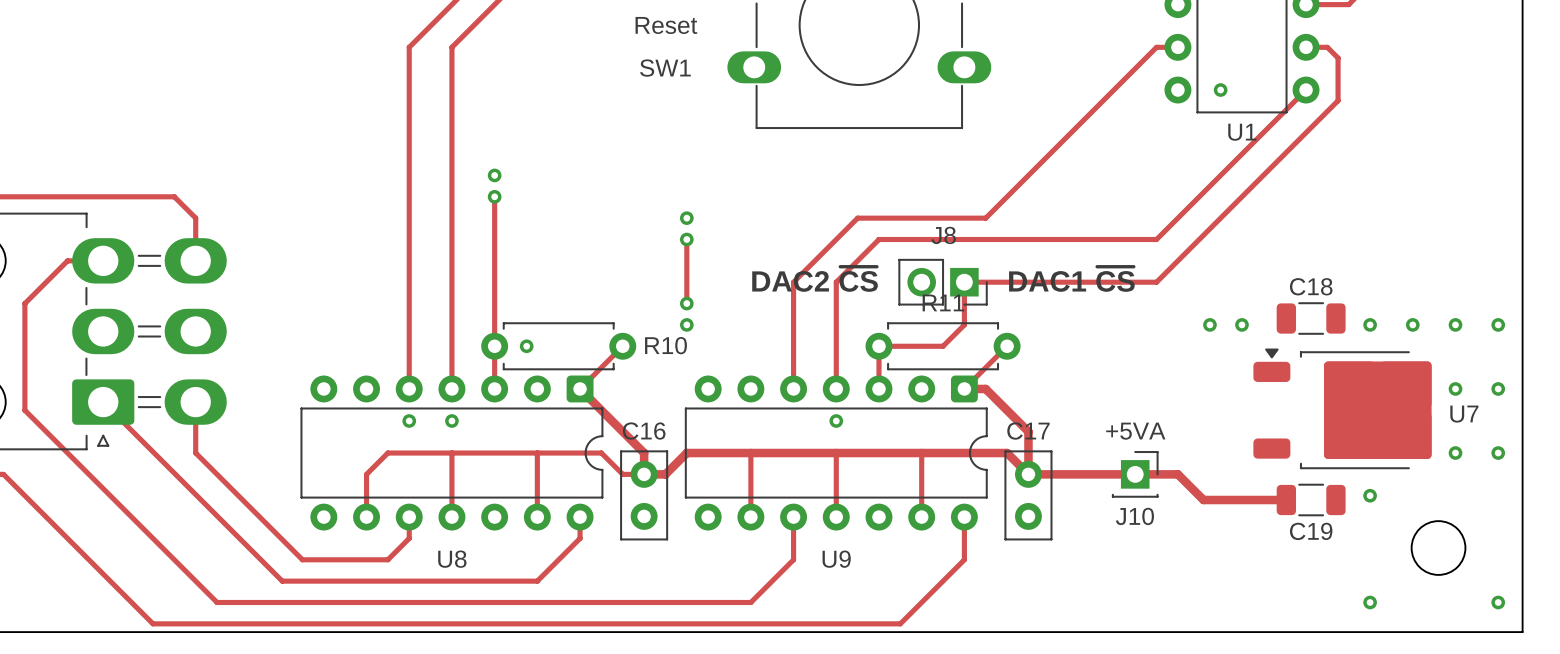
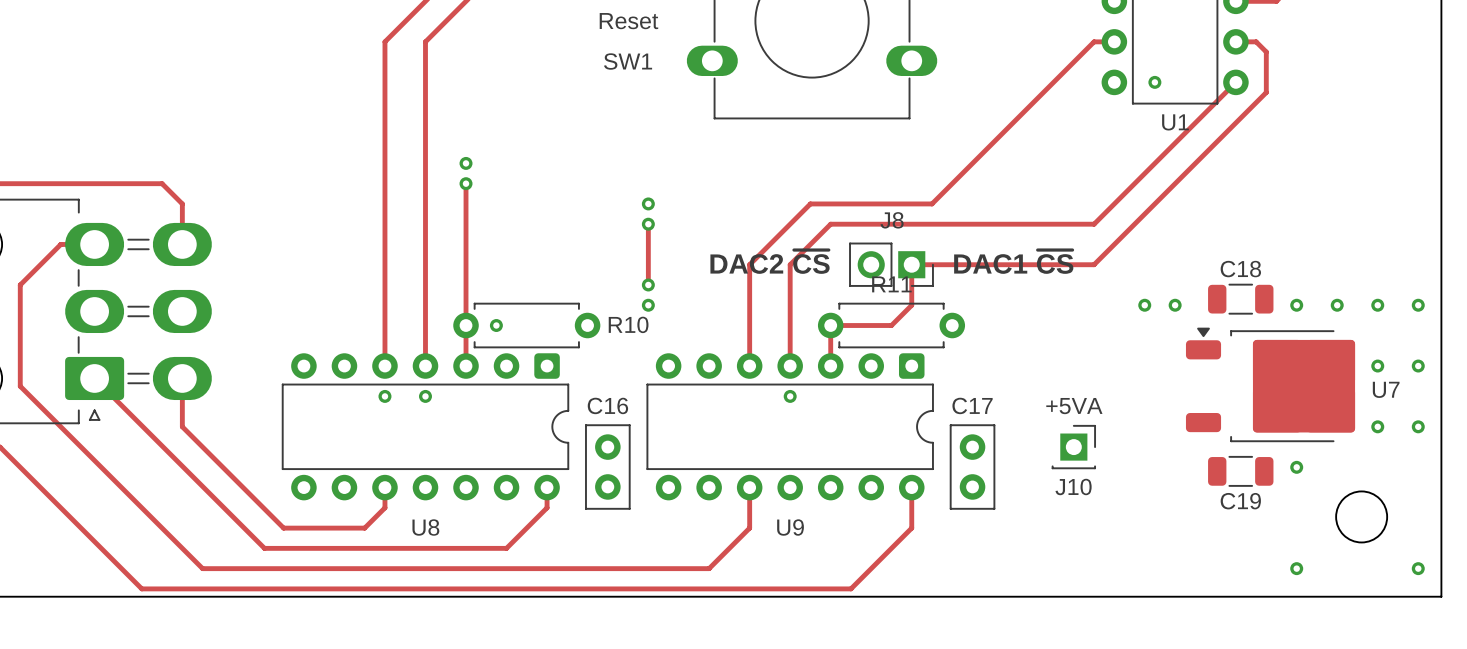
track: (622, 346) (580, 388) (644, 453) (644, 474) -> none
track: (1007, 346) (964, 388) (985, 388) (1028, 431) (1028, 474) -> none
track: (451, 453) (451, 517) -> none
track: (537, 453) (537, 517) -> none
track: (750, 453) (750, 517) -> none
track: (836, 453) (836, 517) -> none
track: (921, 453) (921, 517) -> none
track: (644, 474) (665, 474) (686, 453) (1007, 453) (1028, 474) -> none
track: (644, 474) (622, 474) (601, 453) (387, 453) (366, 474) (366, 517) -> none
track: (1028, 474) (1177, 474) (1203, 500) (1286, 500) -> none

